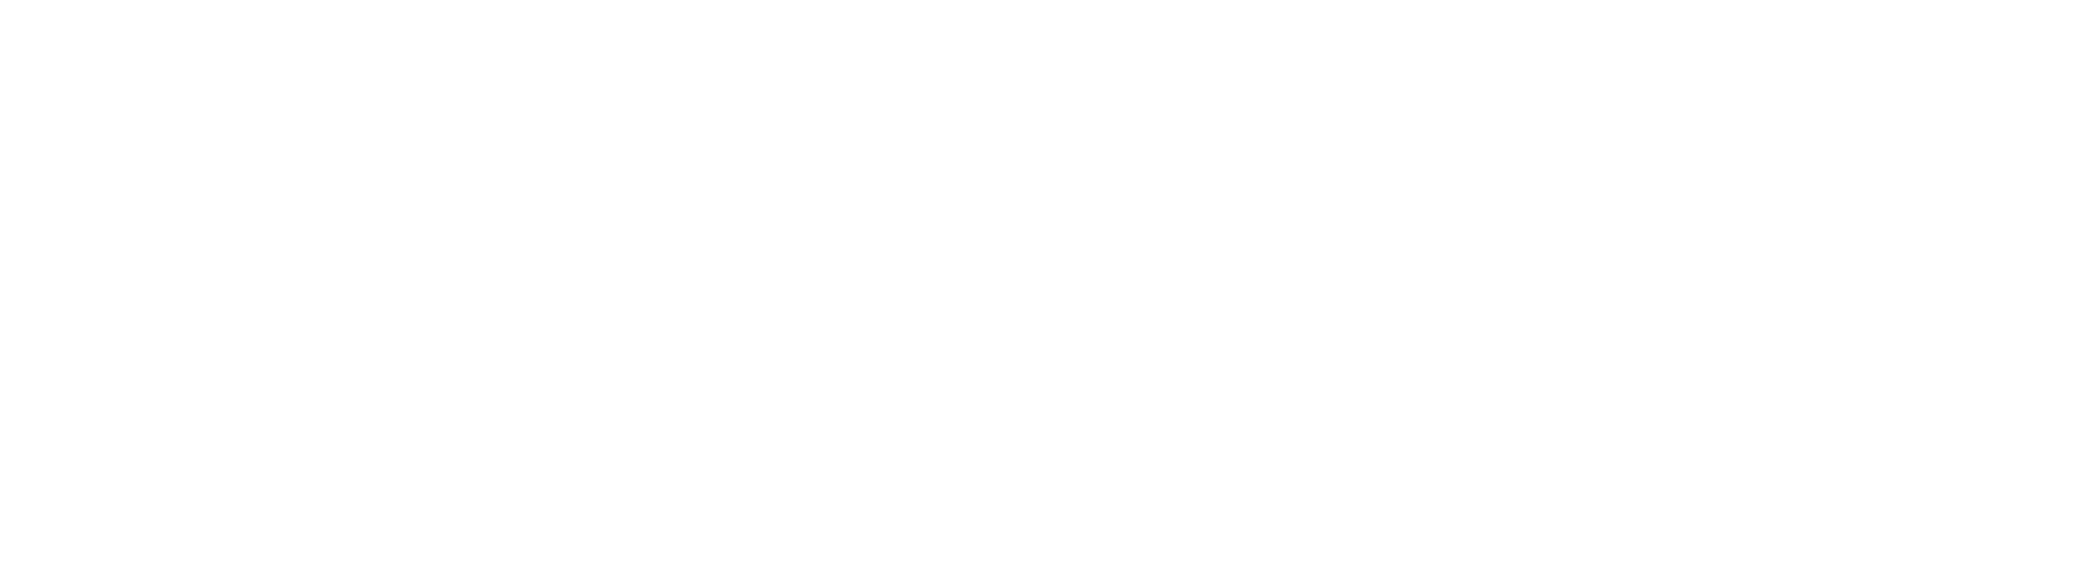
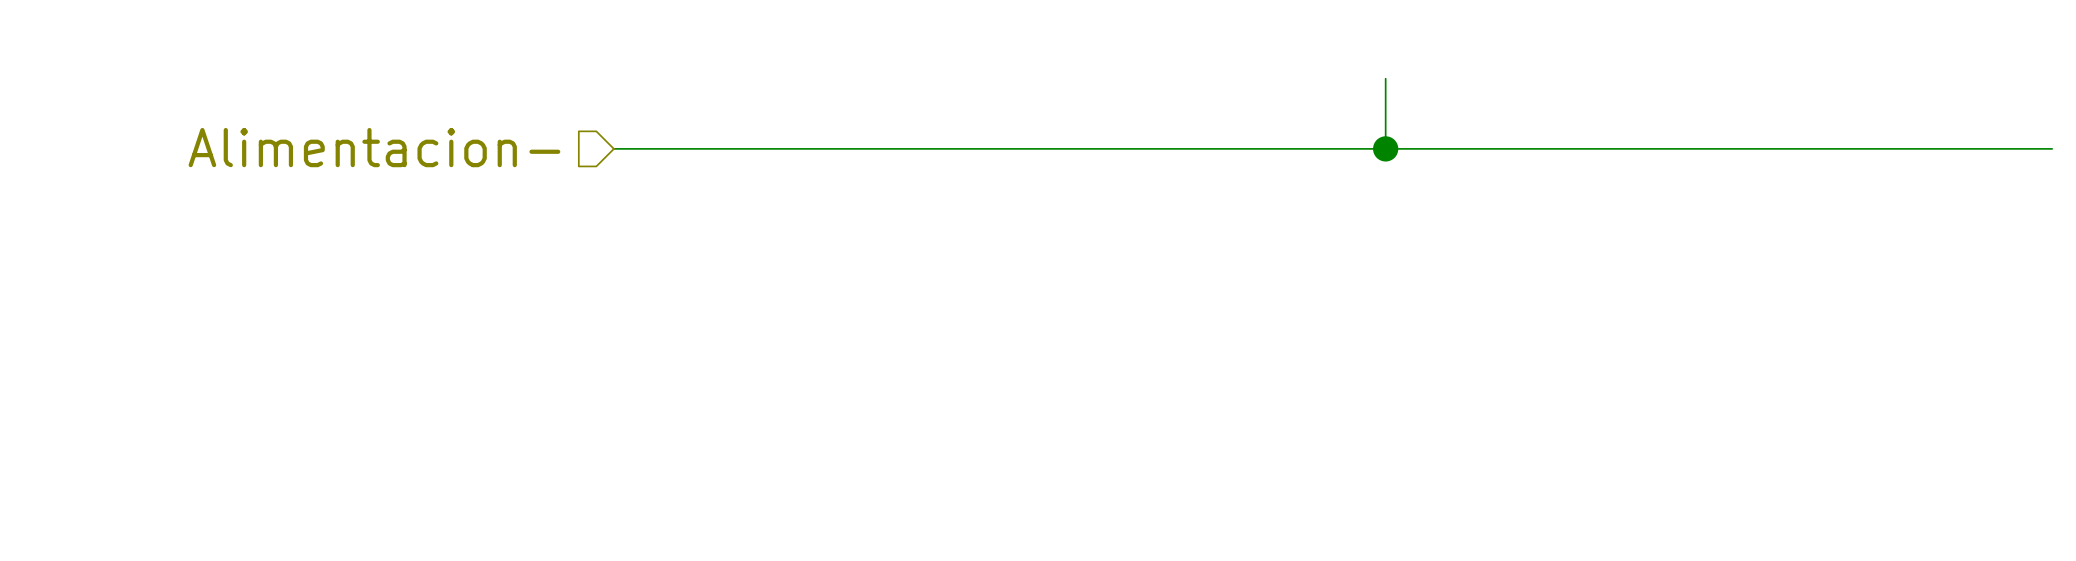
wire: none -> (1385, 78) (1385, 148)
hierarchical label: none -> Alimentacion- (374, 147)
wire: none -> (613, 148) (2052, 148)
junction: none -> (1385, 148)

